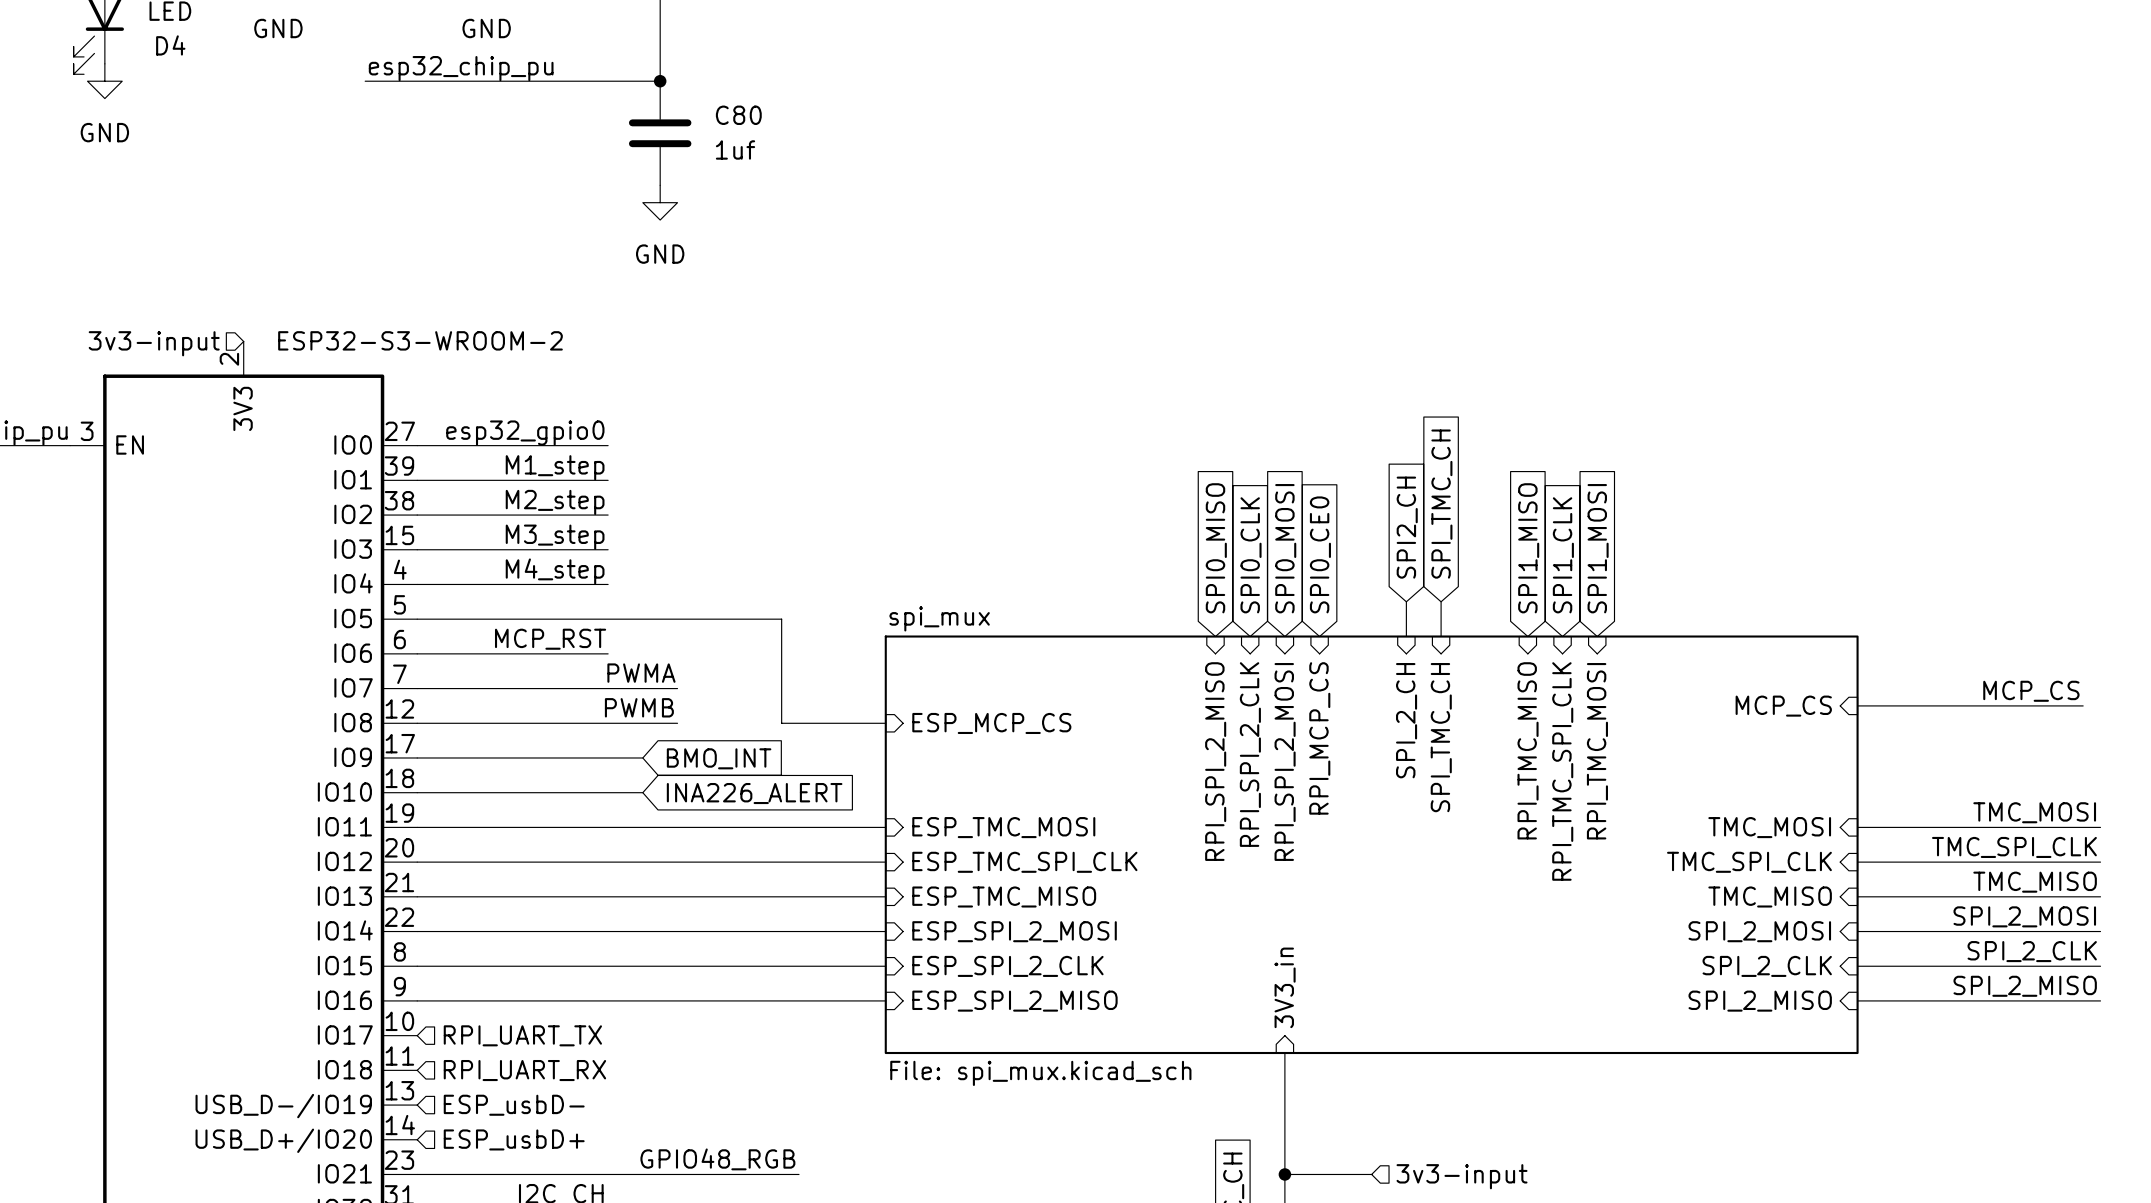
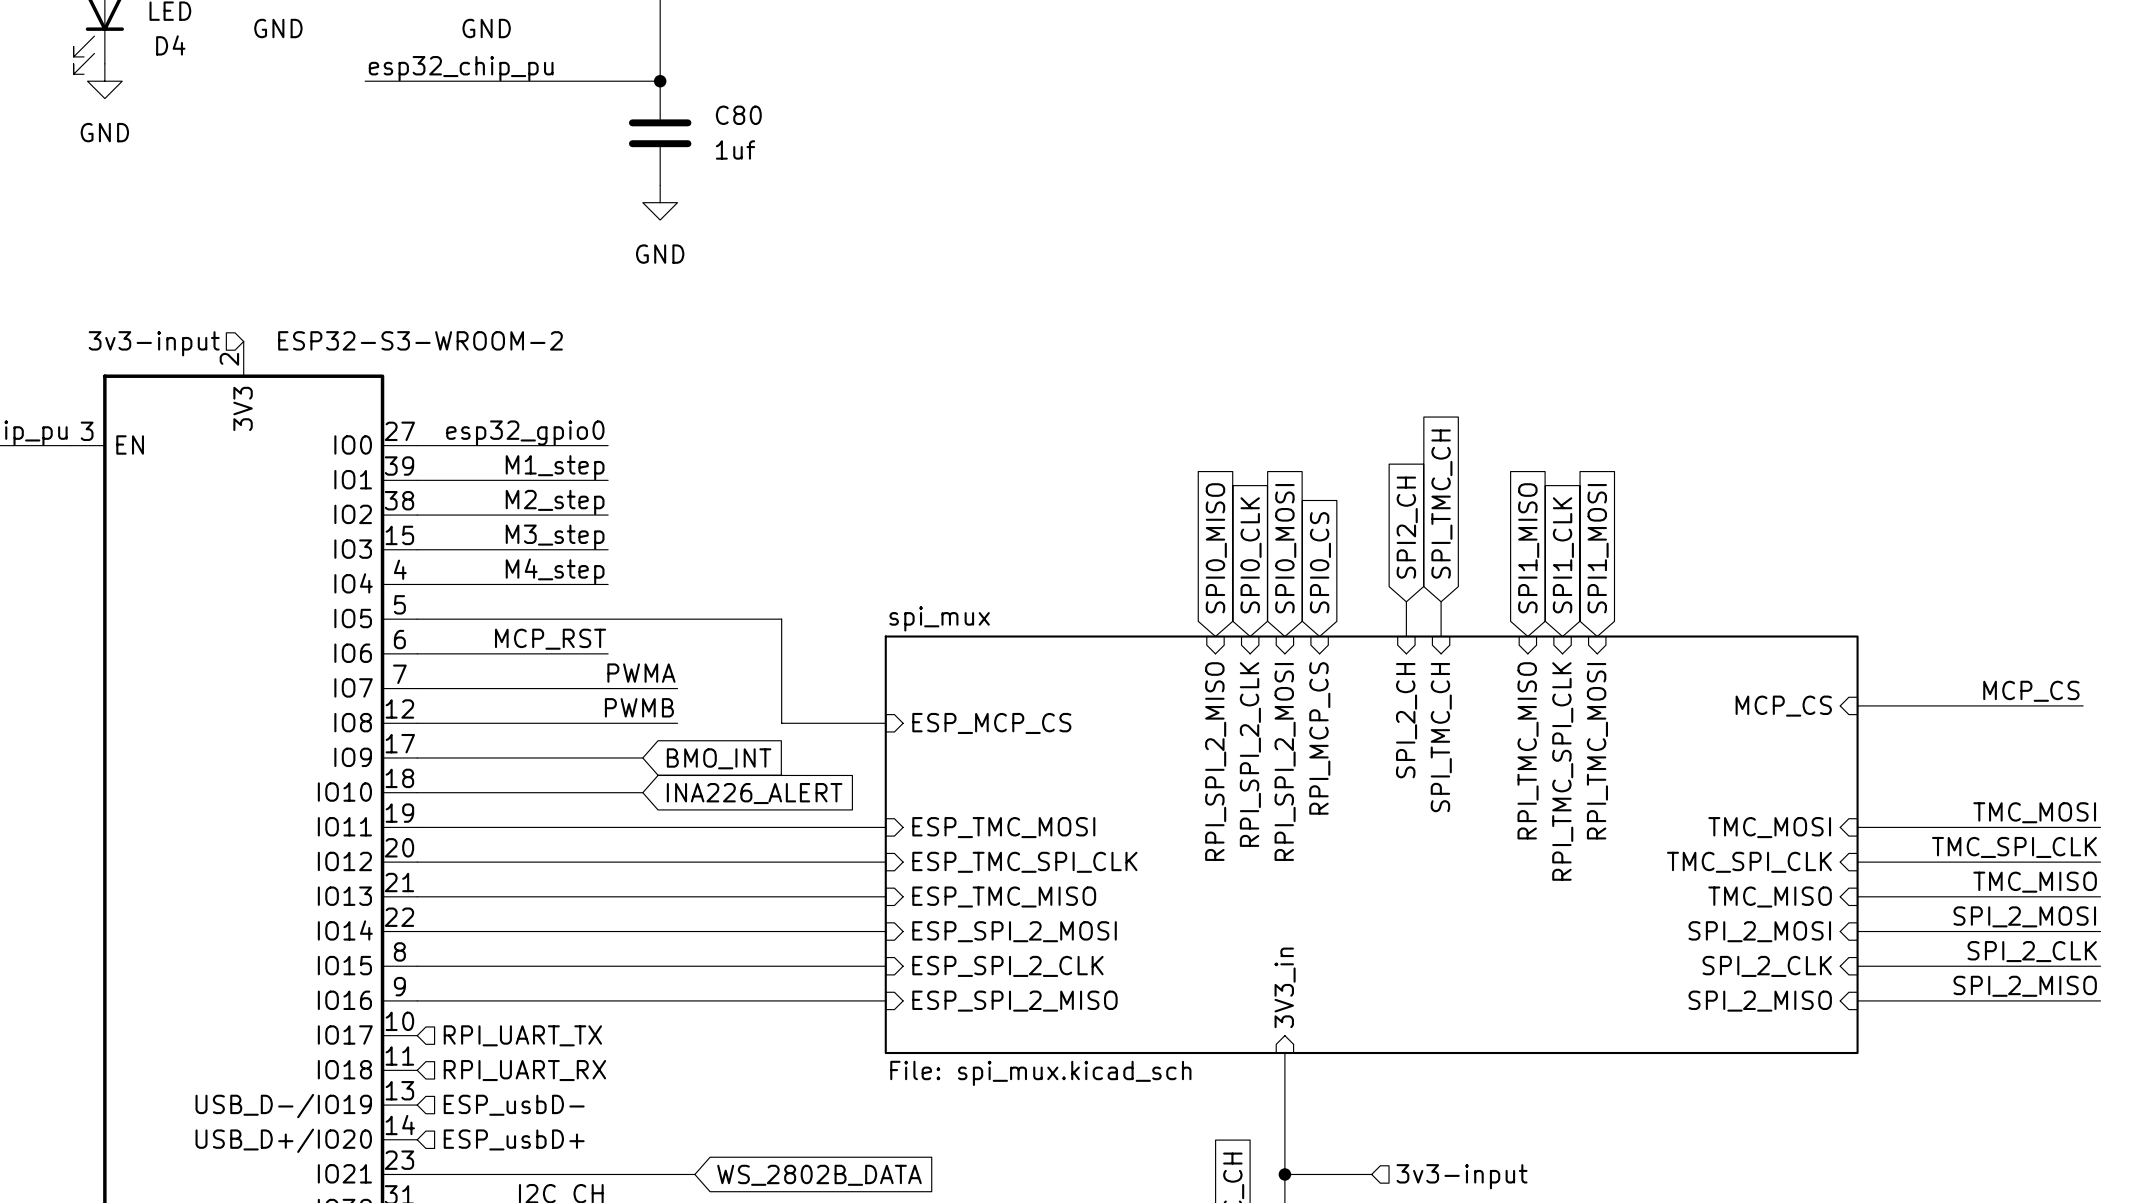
global label: SPI0_CE0 (1320, 554) -> SPI0_CS (1320, 562)
label: GPIO48_RGB (717, 1159) -> none
wire: (694, 1174) (799, 1174) -> none
global label: none -> WS_2802B_DATA (819, 1175)

